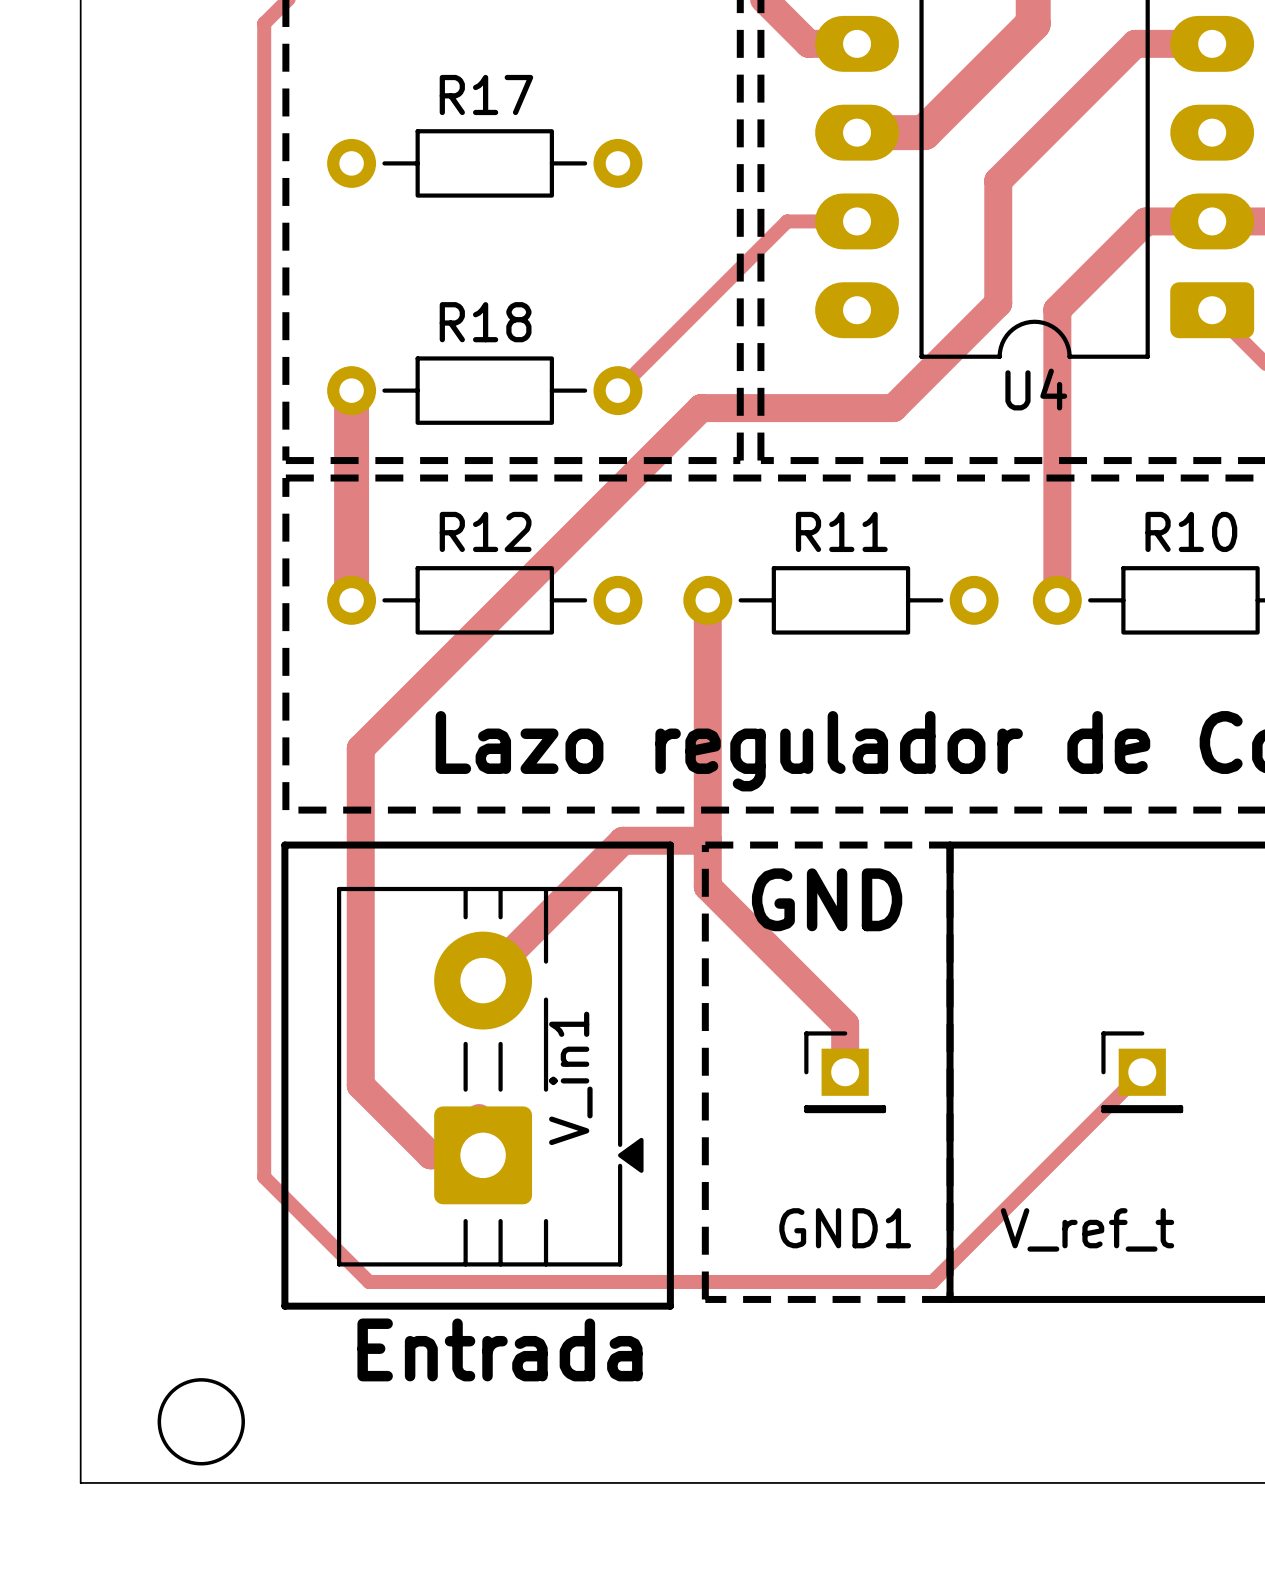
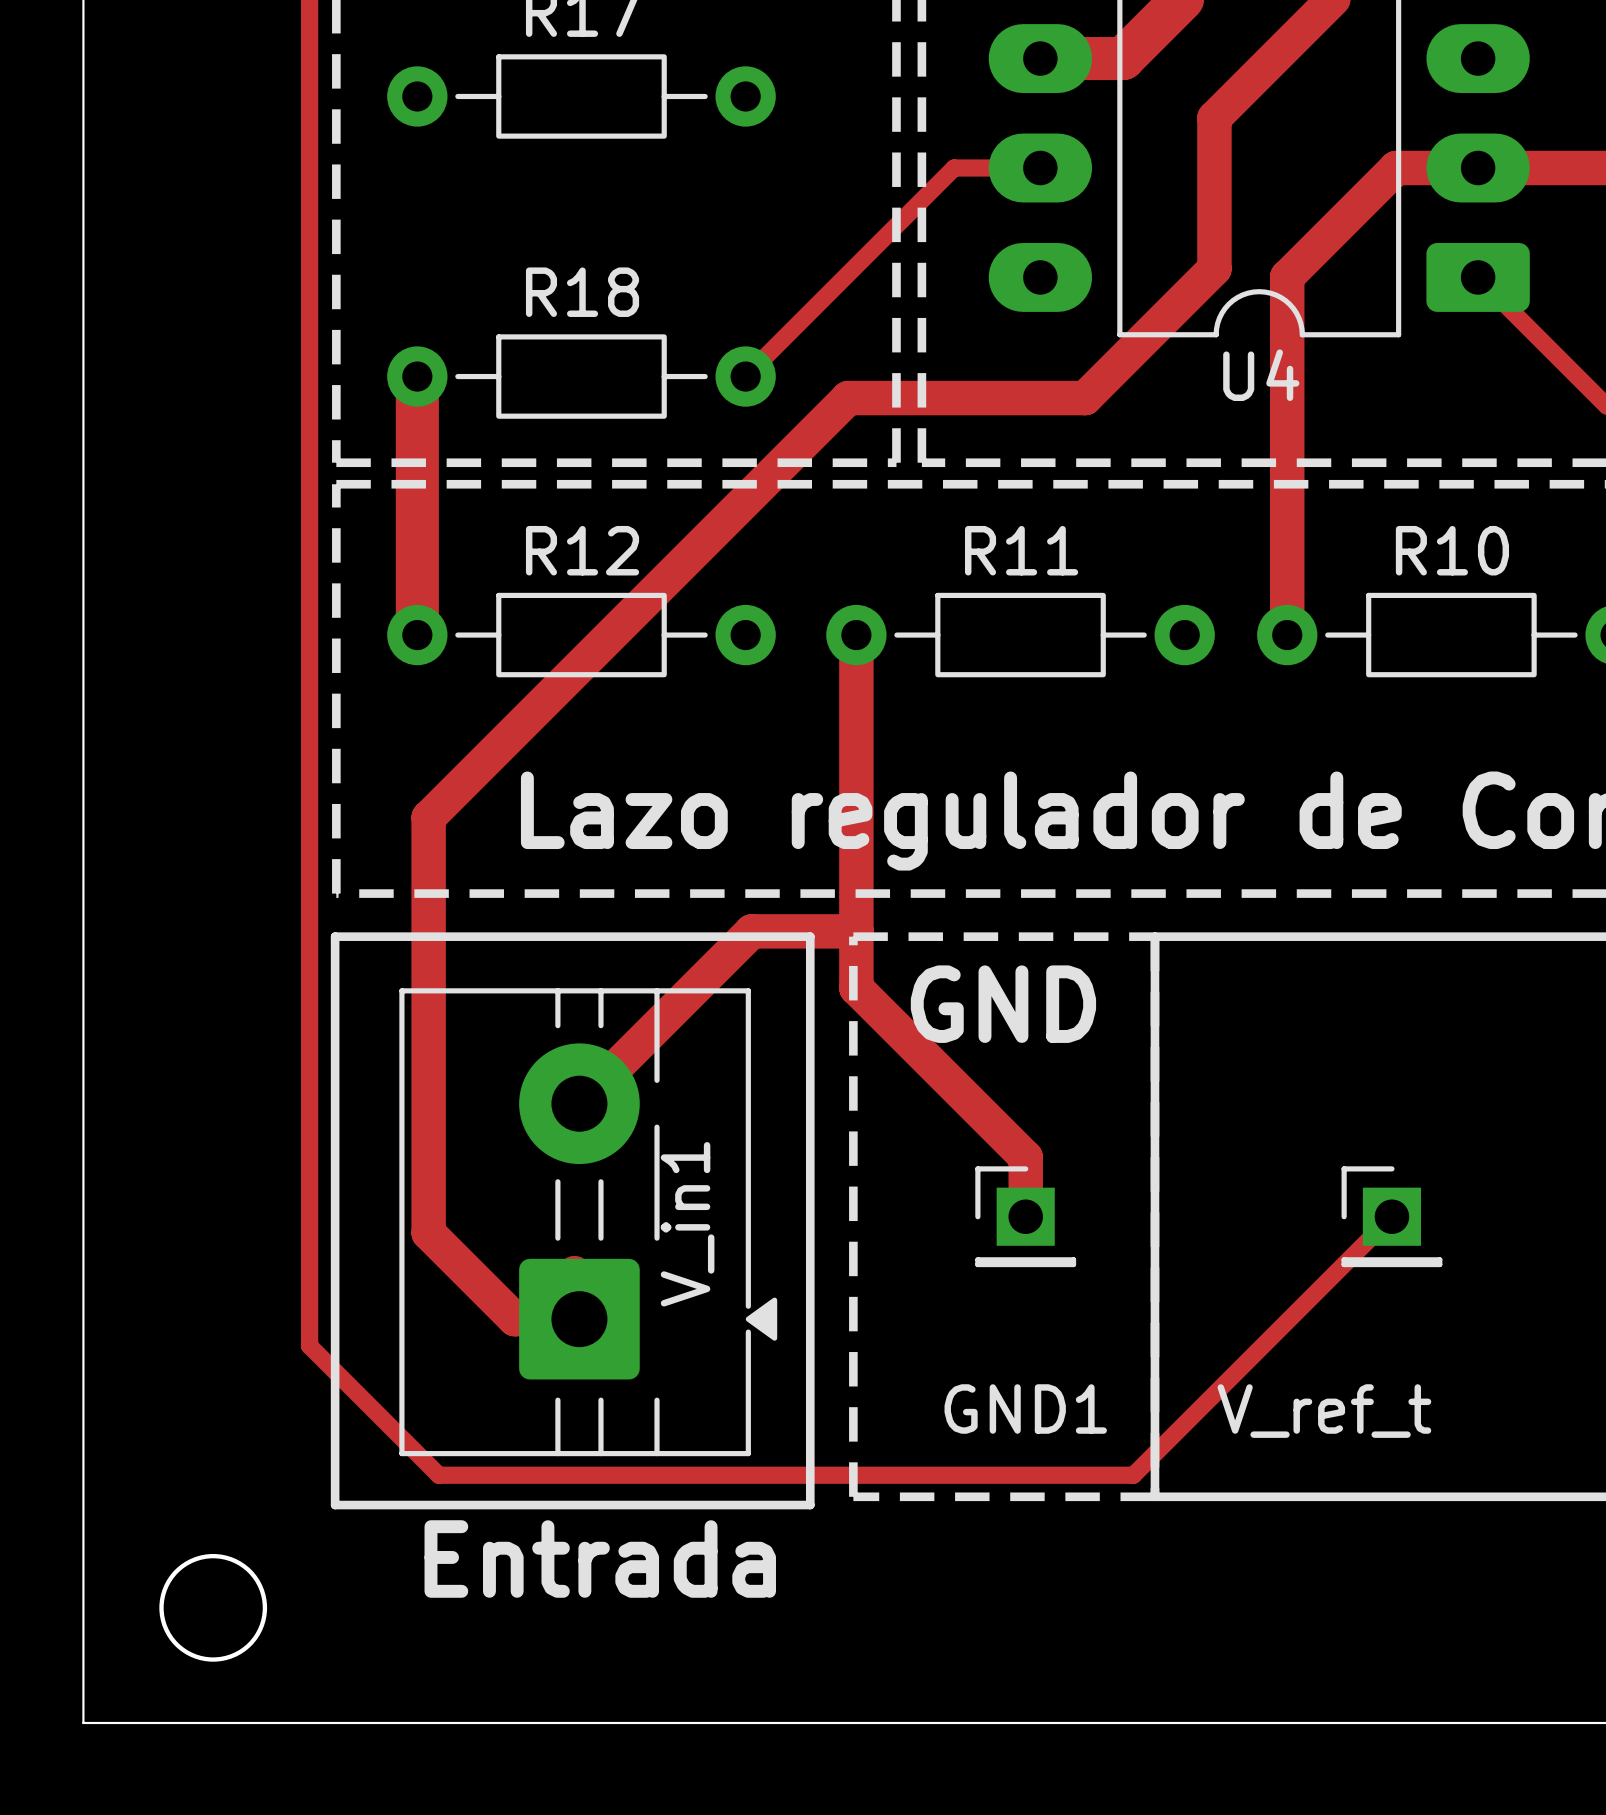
round board edge position: (201, 1421) -> (213, 1607)

